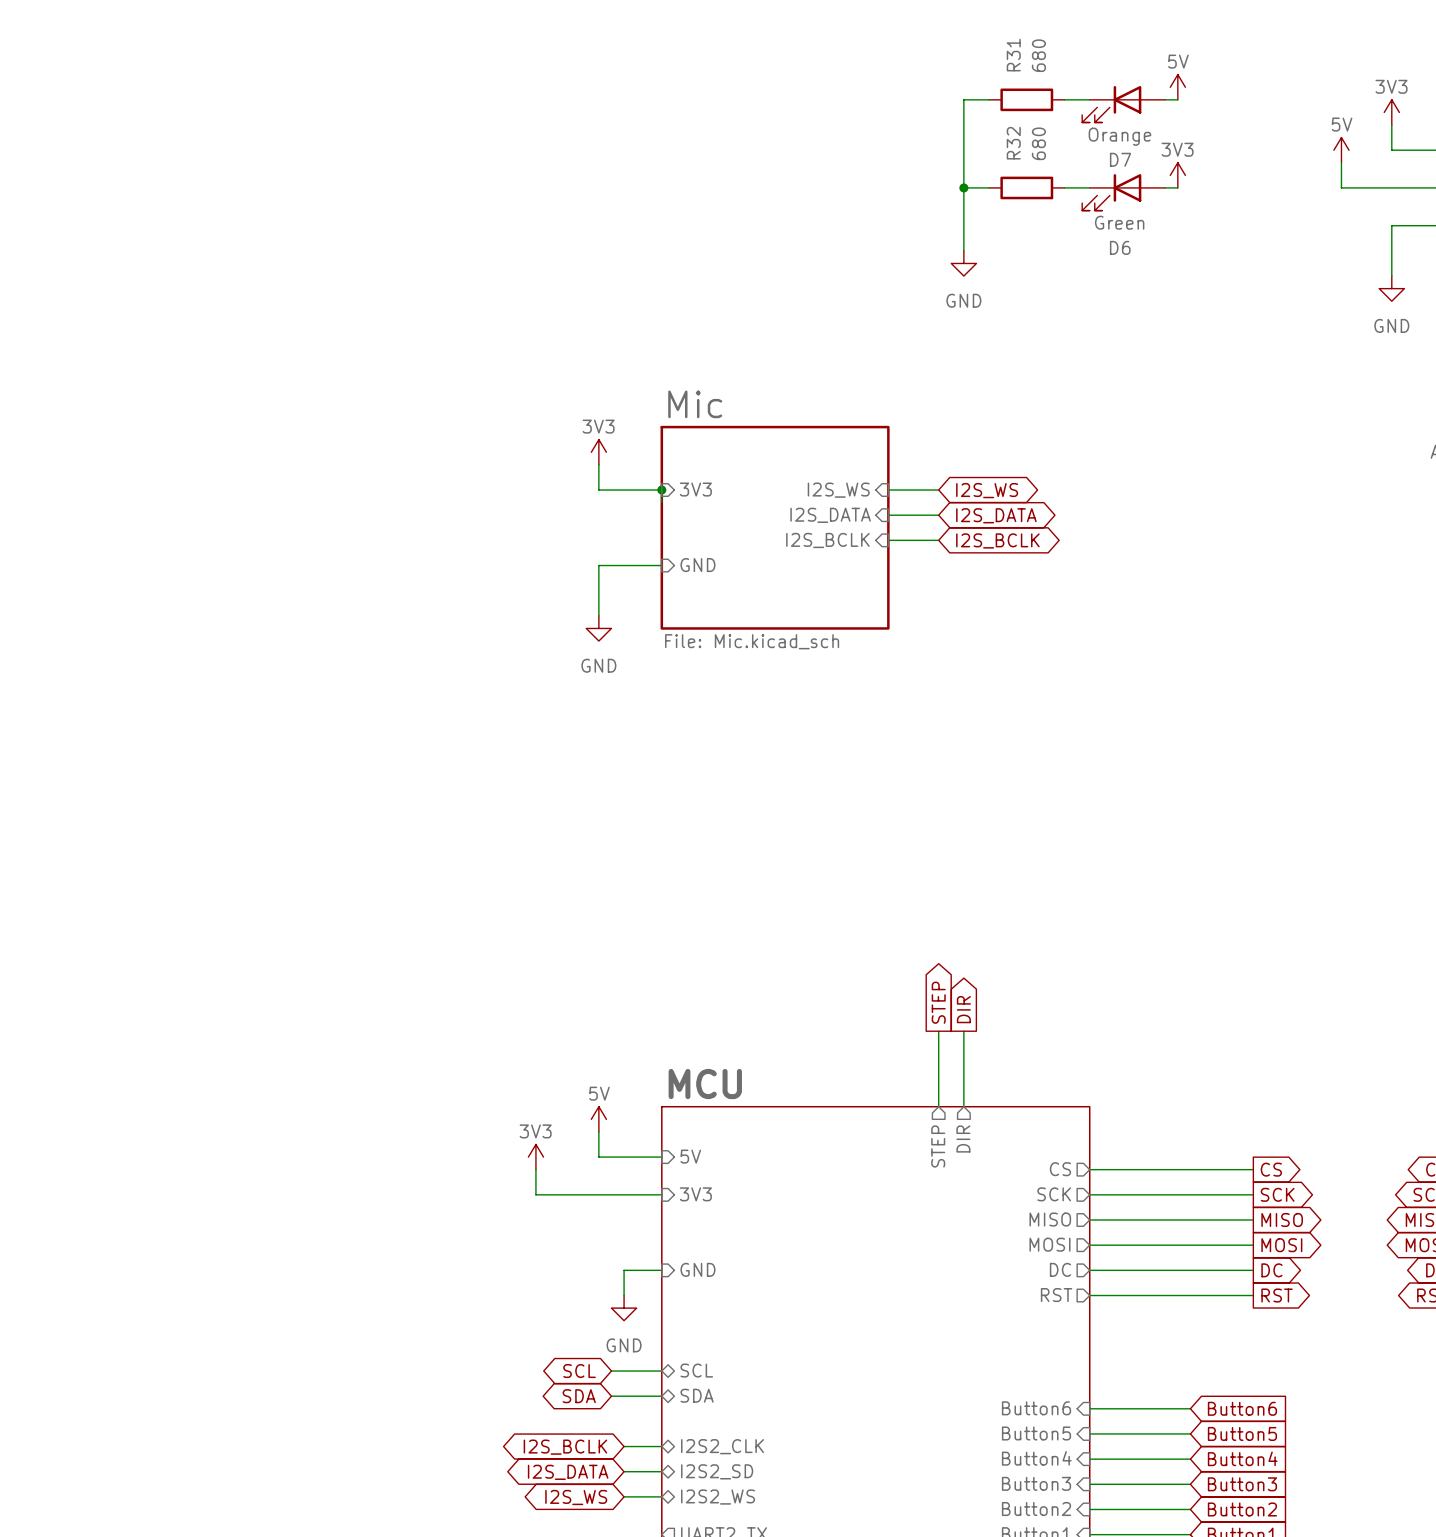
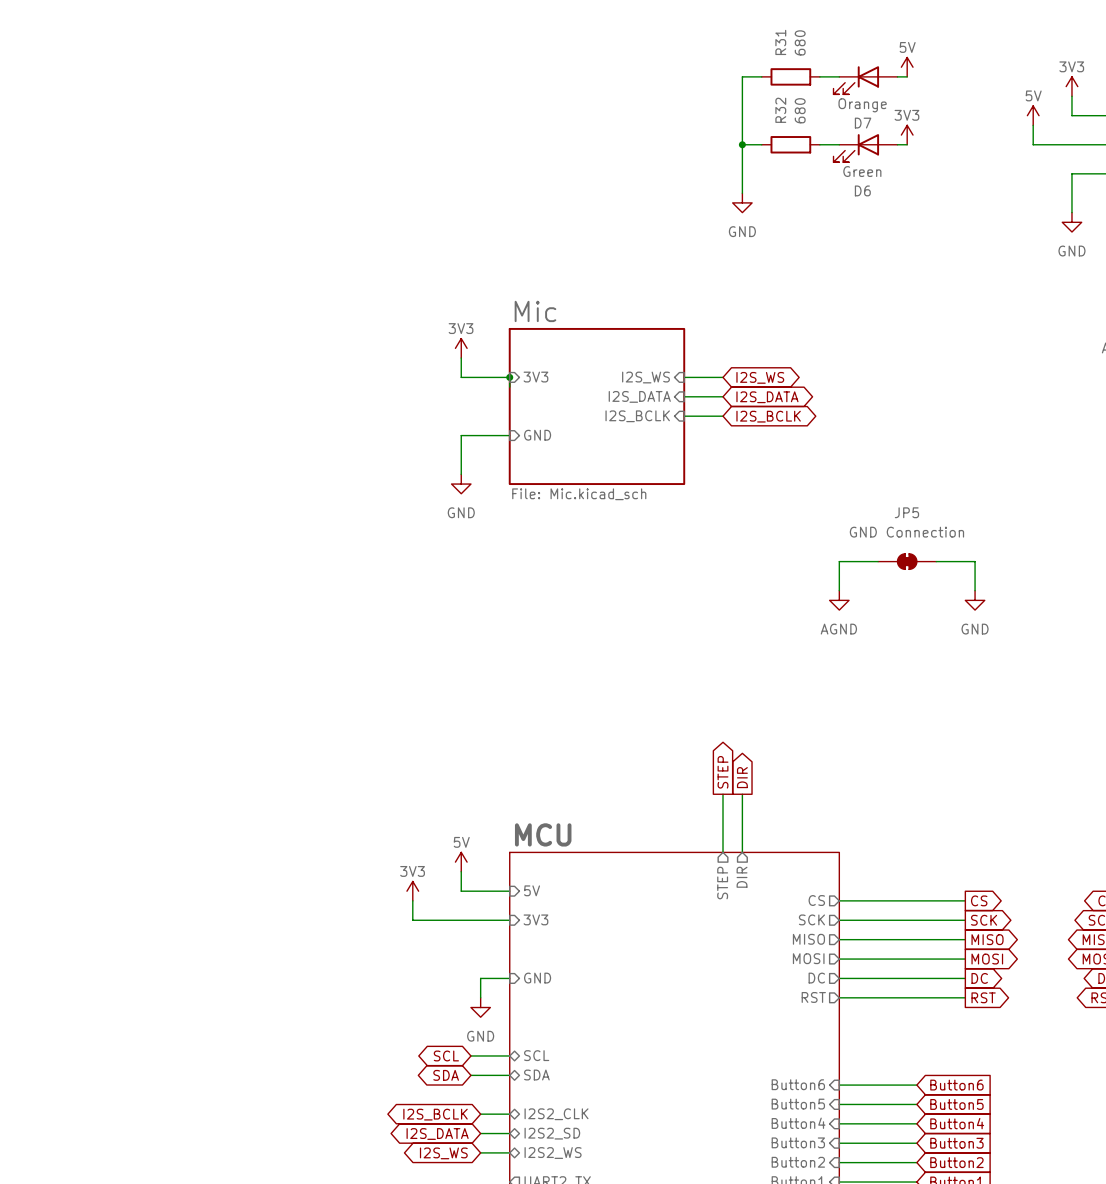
wire: none -> (878, 561) (839, 561) (839, 590)
JP5: none -> GND Connection (907, 561)
wire: none -> (936, 561) (975, 561) (975, 590)
power symbol: none -> AGND (839, 600)
power symbol: none -> GND (975, 600)

